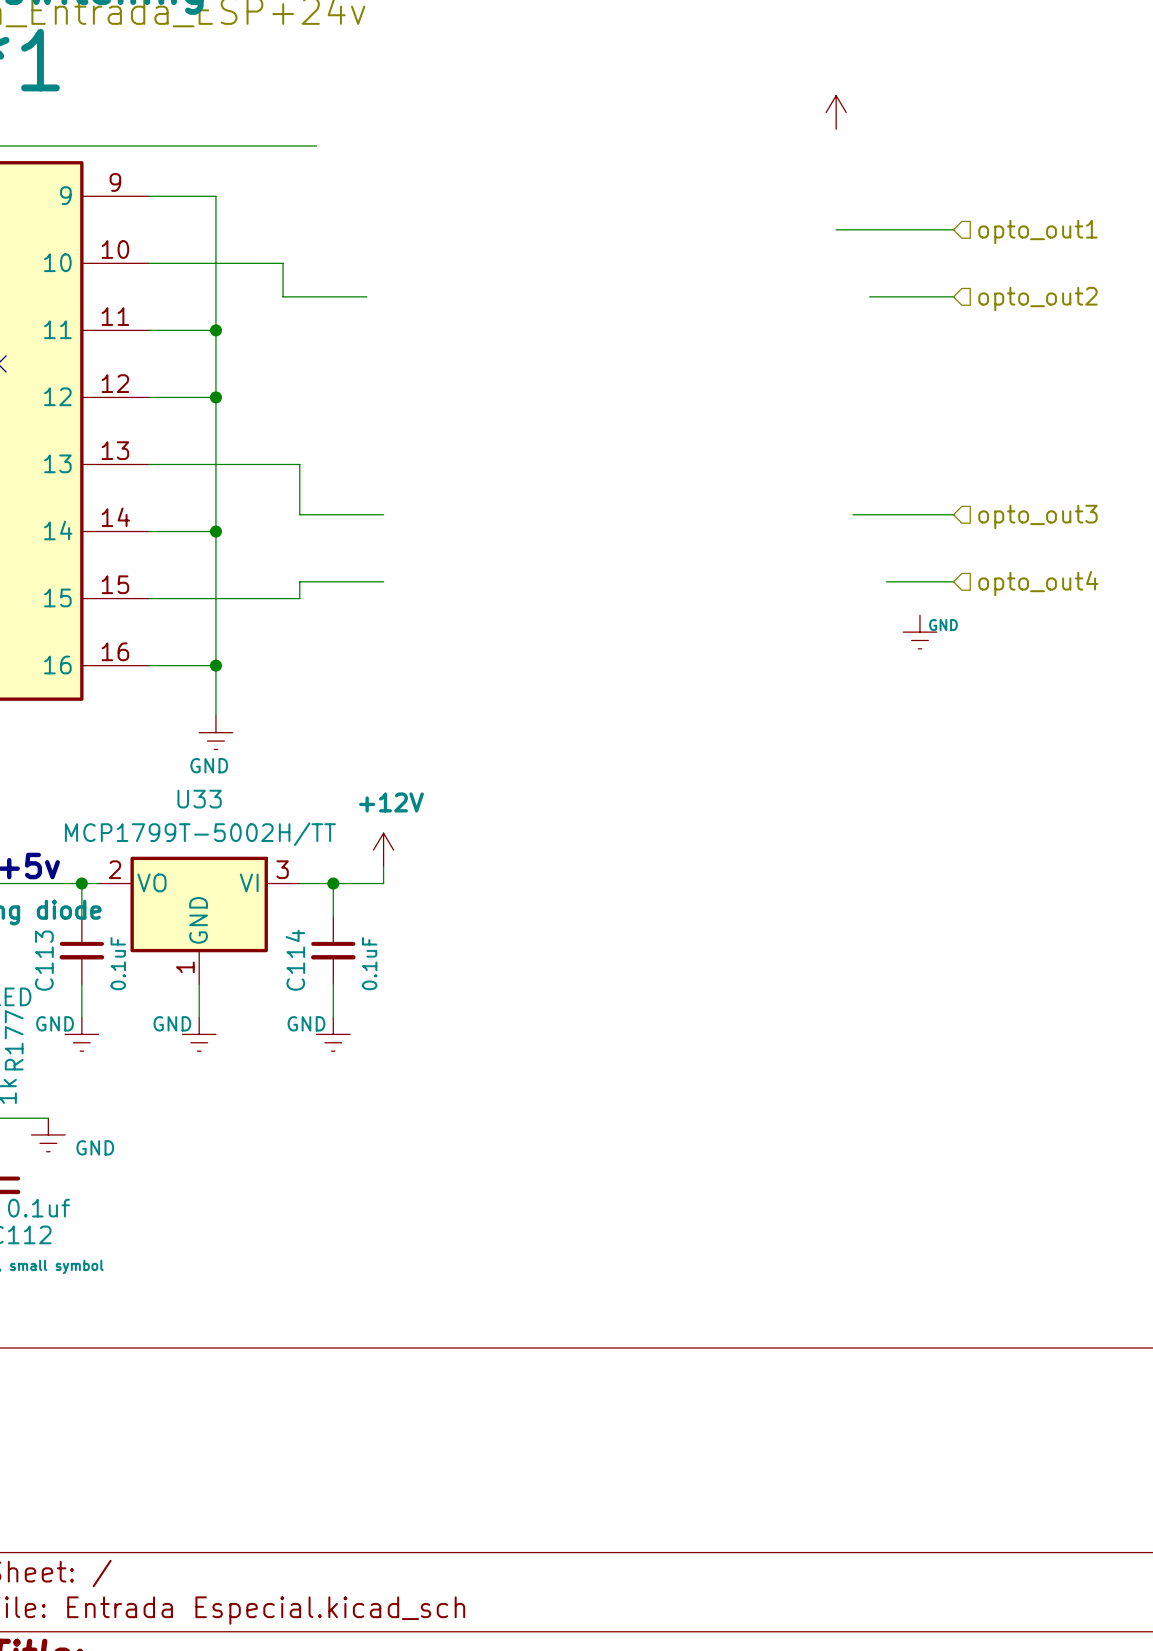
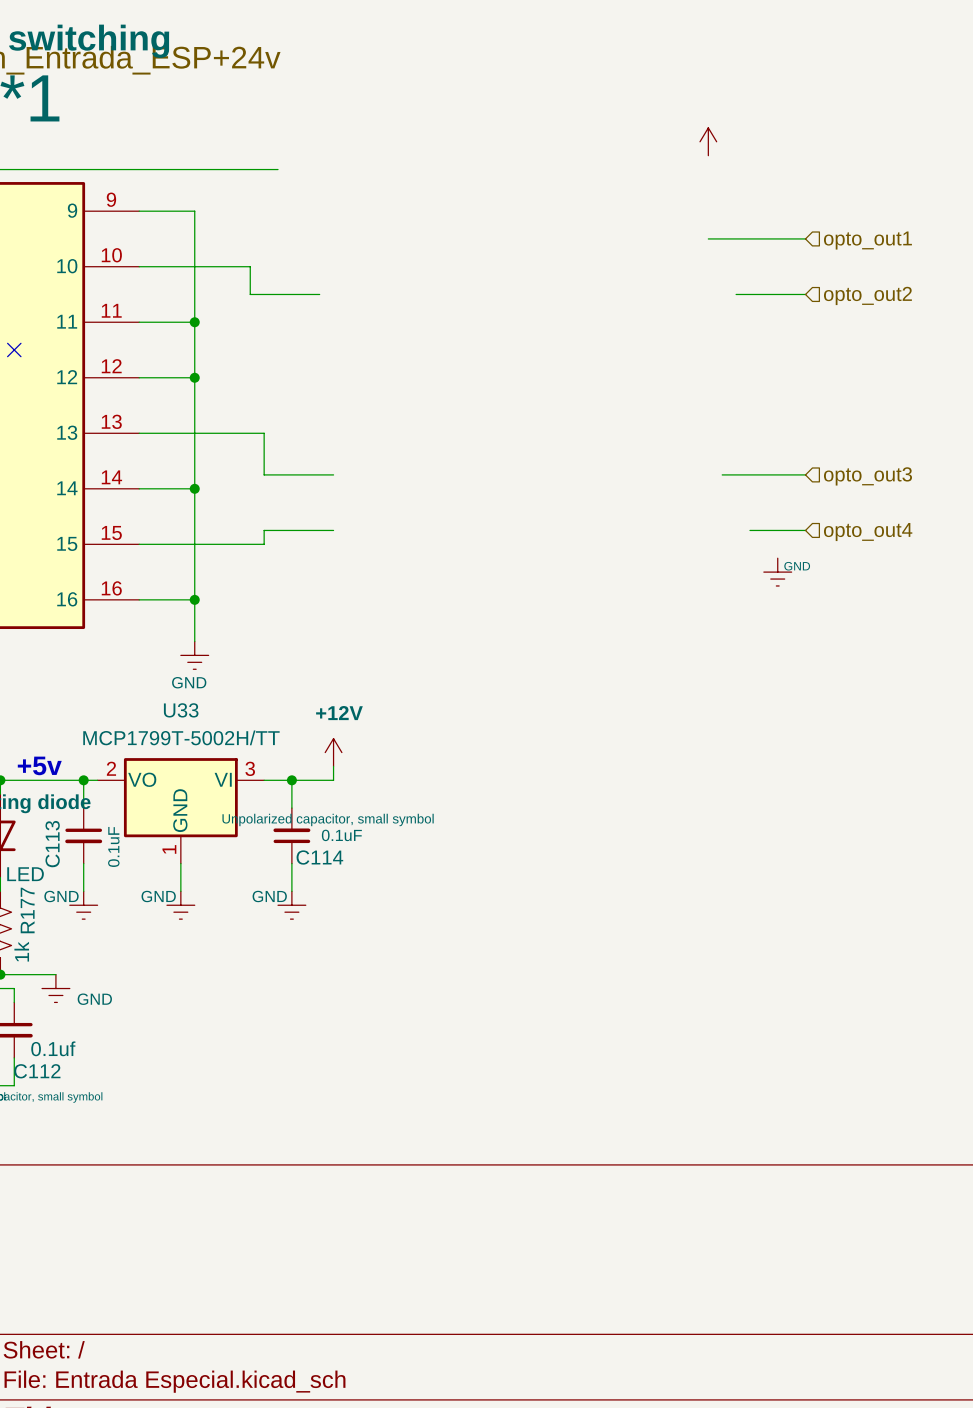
C114 text: none -> Unpolarized capacitor, small symbol (328, 819)
C114 rotation: 0° (333, 950) -> 180° (291, 835)
C114 name position: C114 (295, 960) -> C114 (319, 857)
C114 value position: 0.1uF (369, 963) -> 0.1uF (341, 835)

